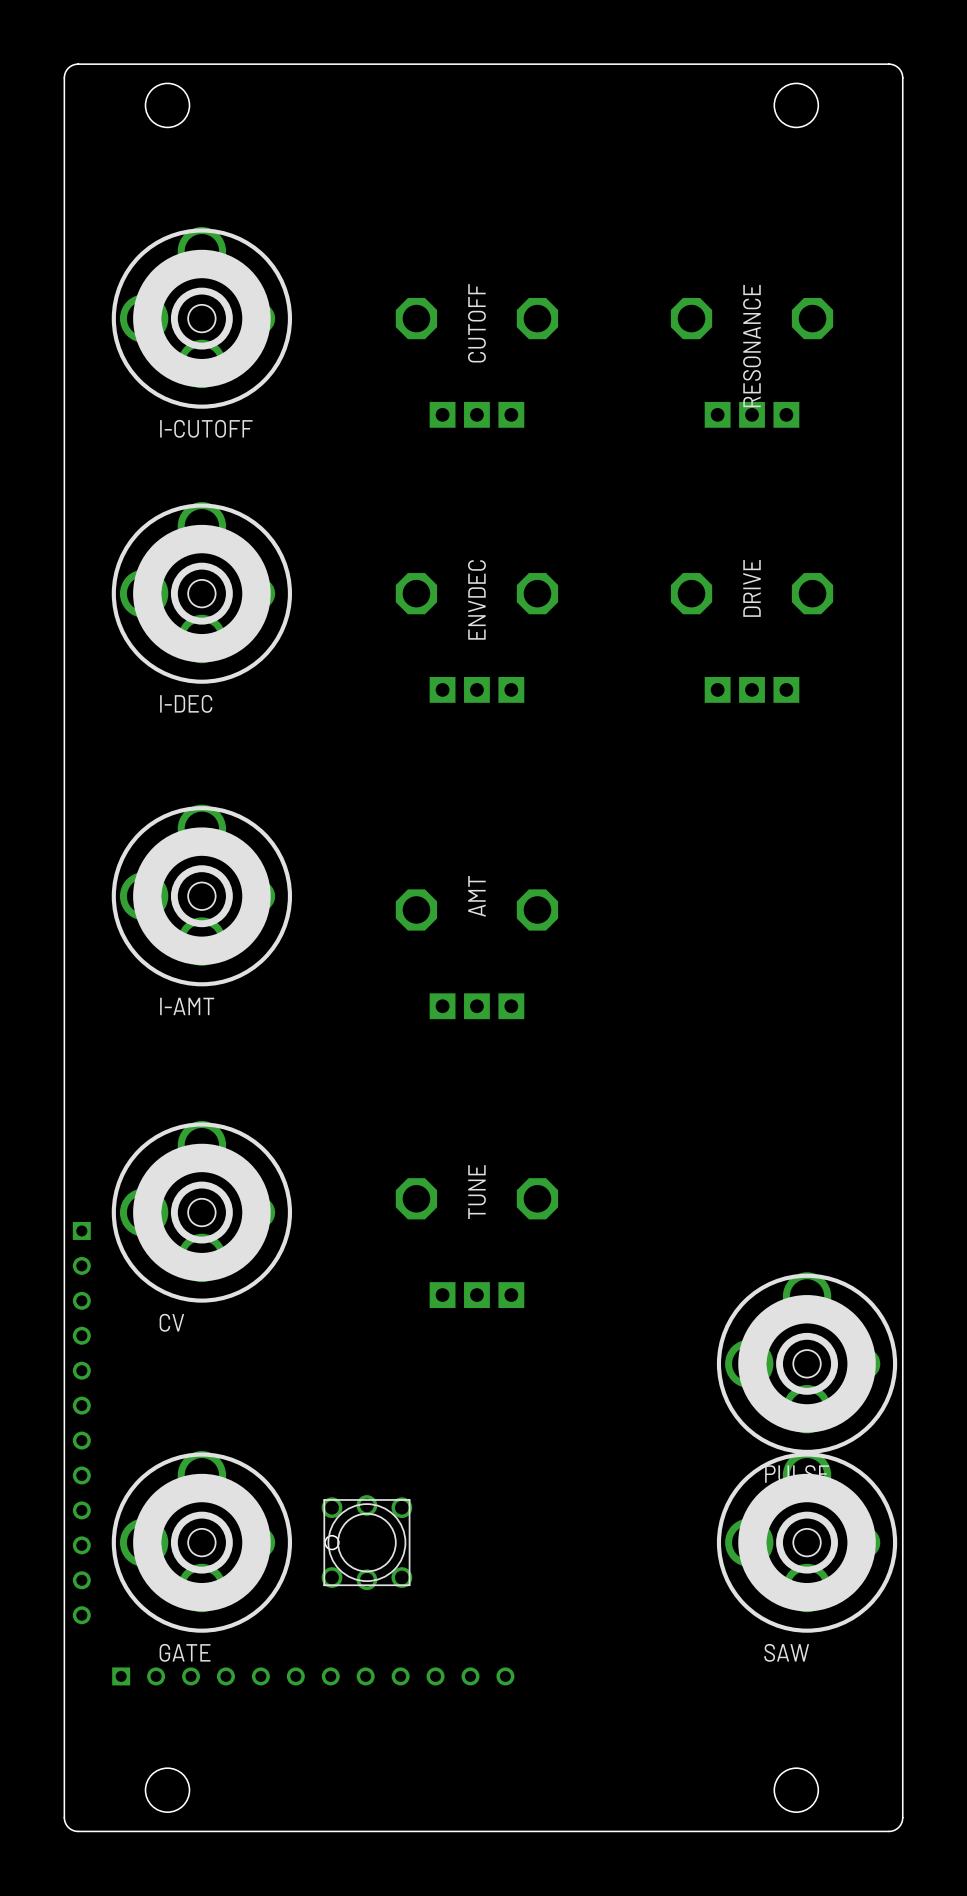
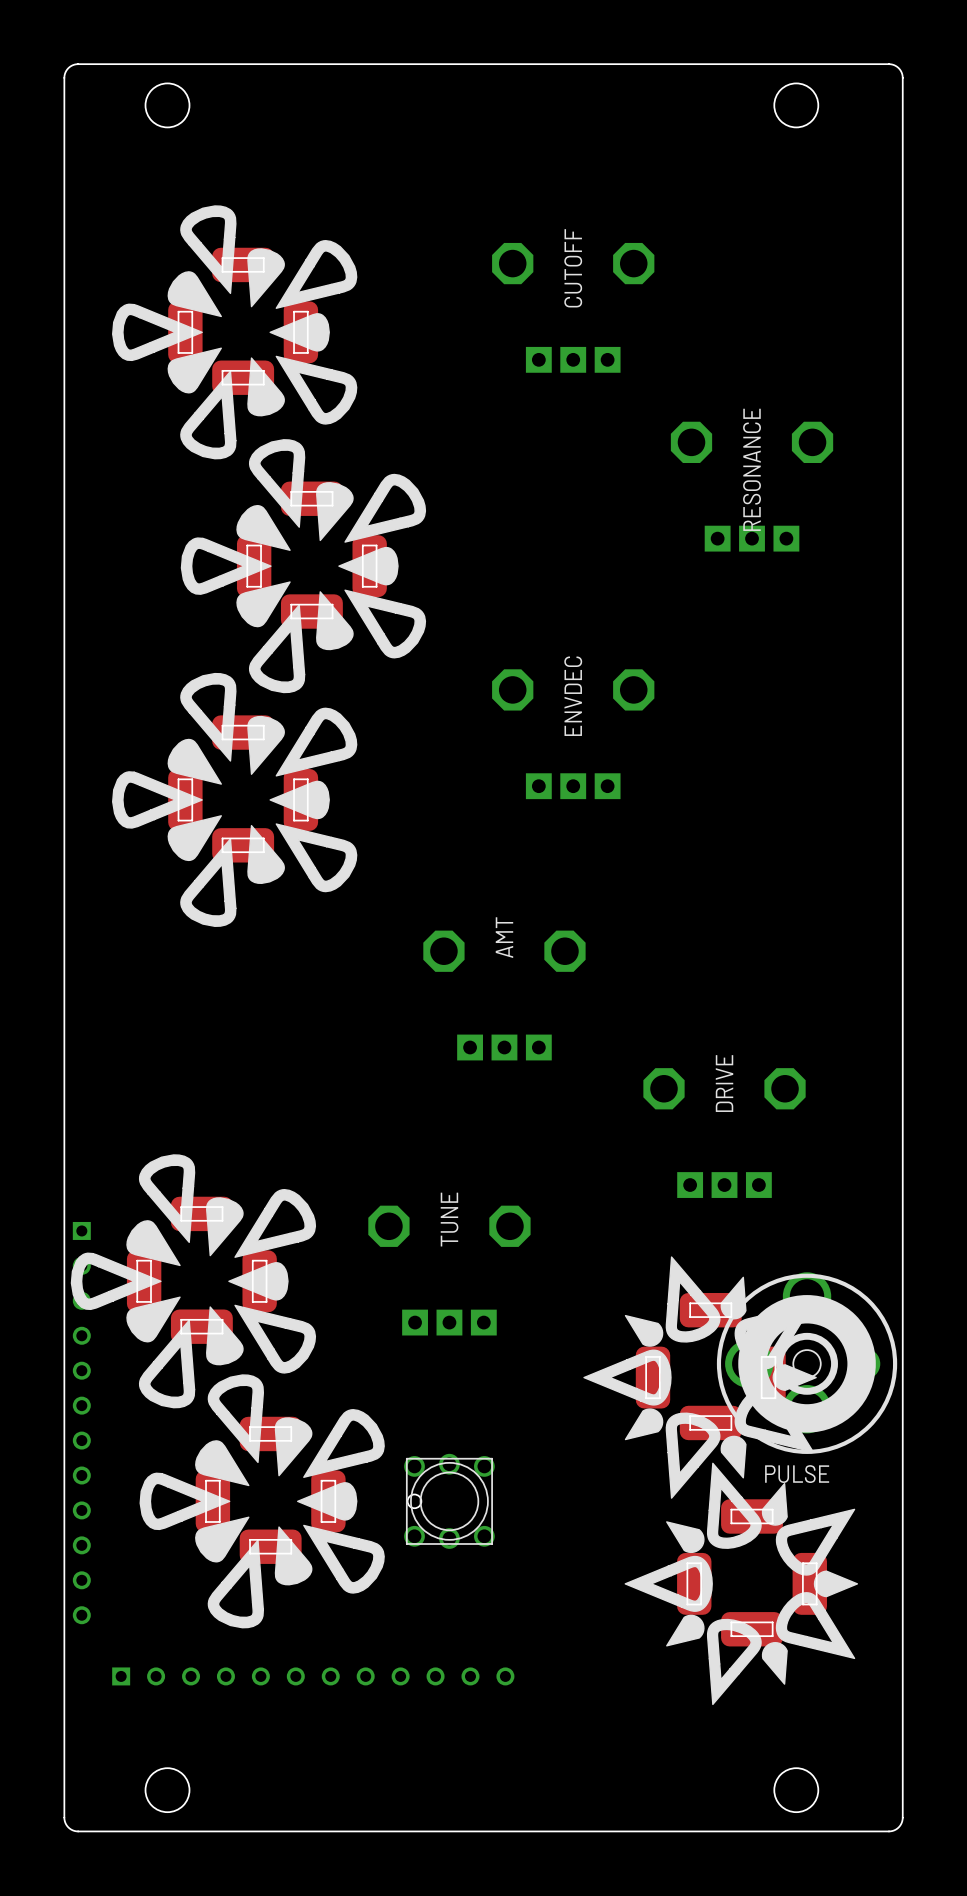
I-CUTOFF: (201, 317) -> none
part: none -> (234, 332)
CUTOFF position: (476, 362) -> (573, 307)
RESONANCE position: (752, 362) -> (752, 486)
part: none -> (303, 566)
I-DEC: (201, 592) -> none
ENVDEC position: (476, 637) -> (573, 734)
DRIVE: (752, 637) -> none
part: none -> (234, 799)
I-AMT: (201, 895) -> none
AMT position: (476, 954) -> (504, 995)
DRIVE: none -> (724, 1133)
CV: (201, 1211) -> none
TUNE position: (476, 1243) -> (449, 1270)
part: none -> (193, 1281)
part: none -> (700, 1377)
part: none -> (262, 1501)
GATE: (201, 1541) -> none
SAW: (807, 1541) -> none
part position: (366, 1542) -> (449, 1501)
part: none -> (741, 1583)

